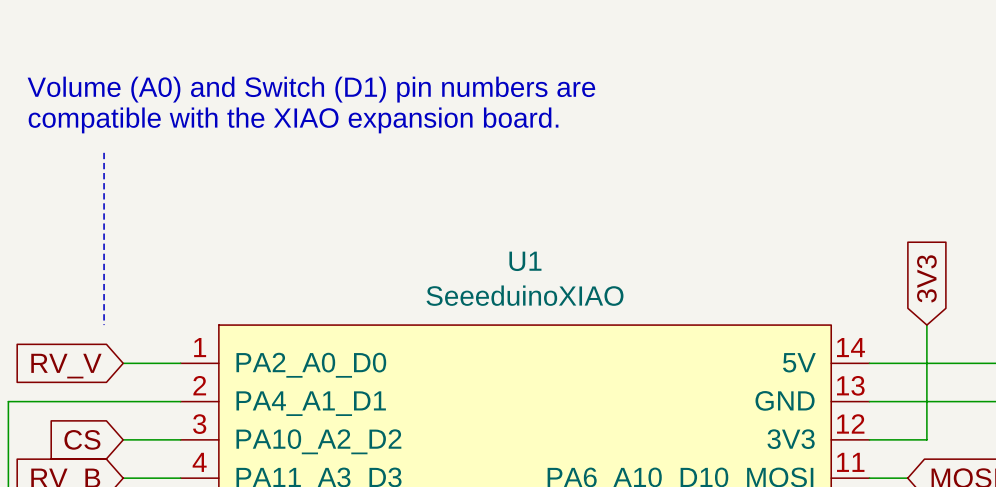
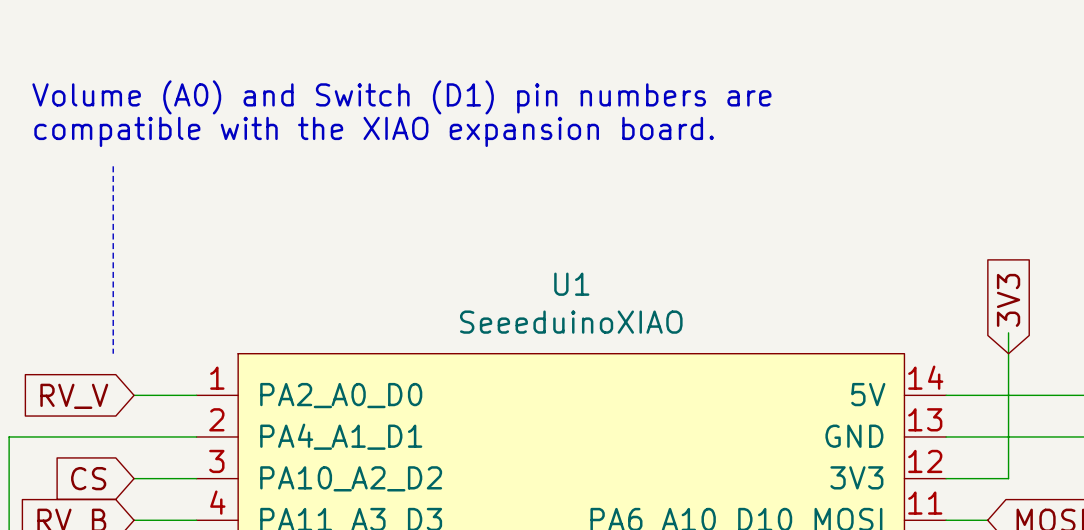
wire: none -> (1008, 332) (1008, 353)

